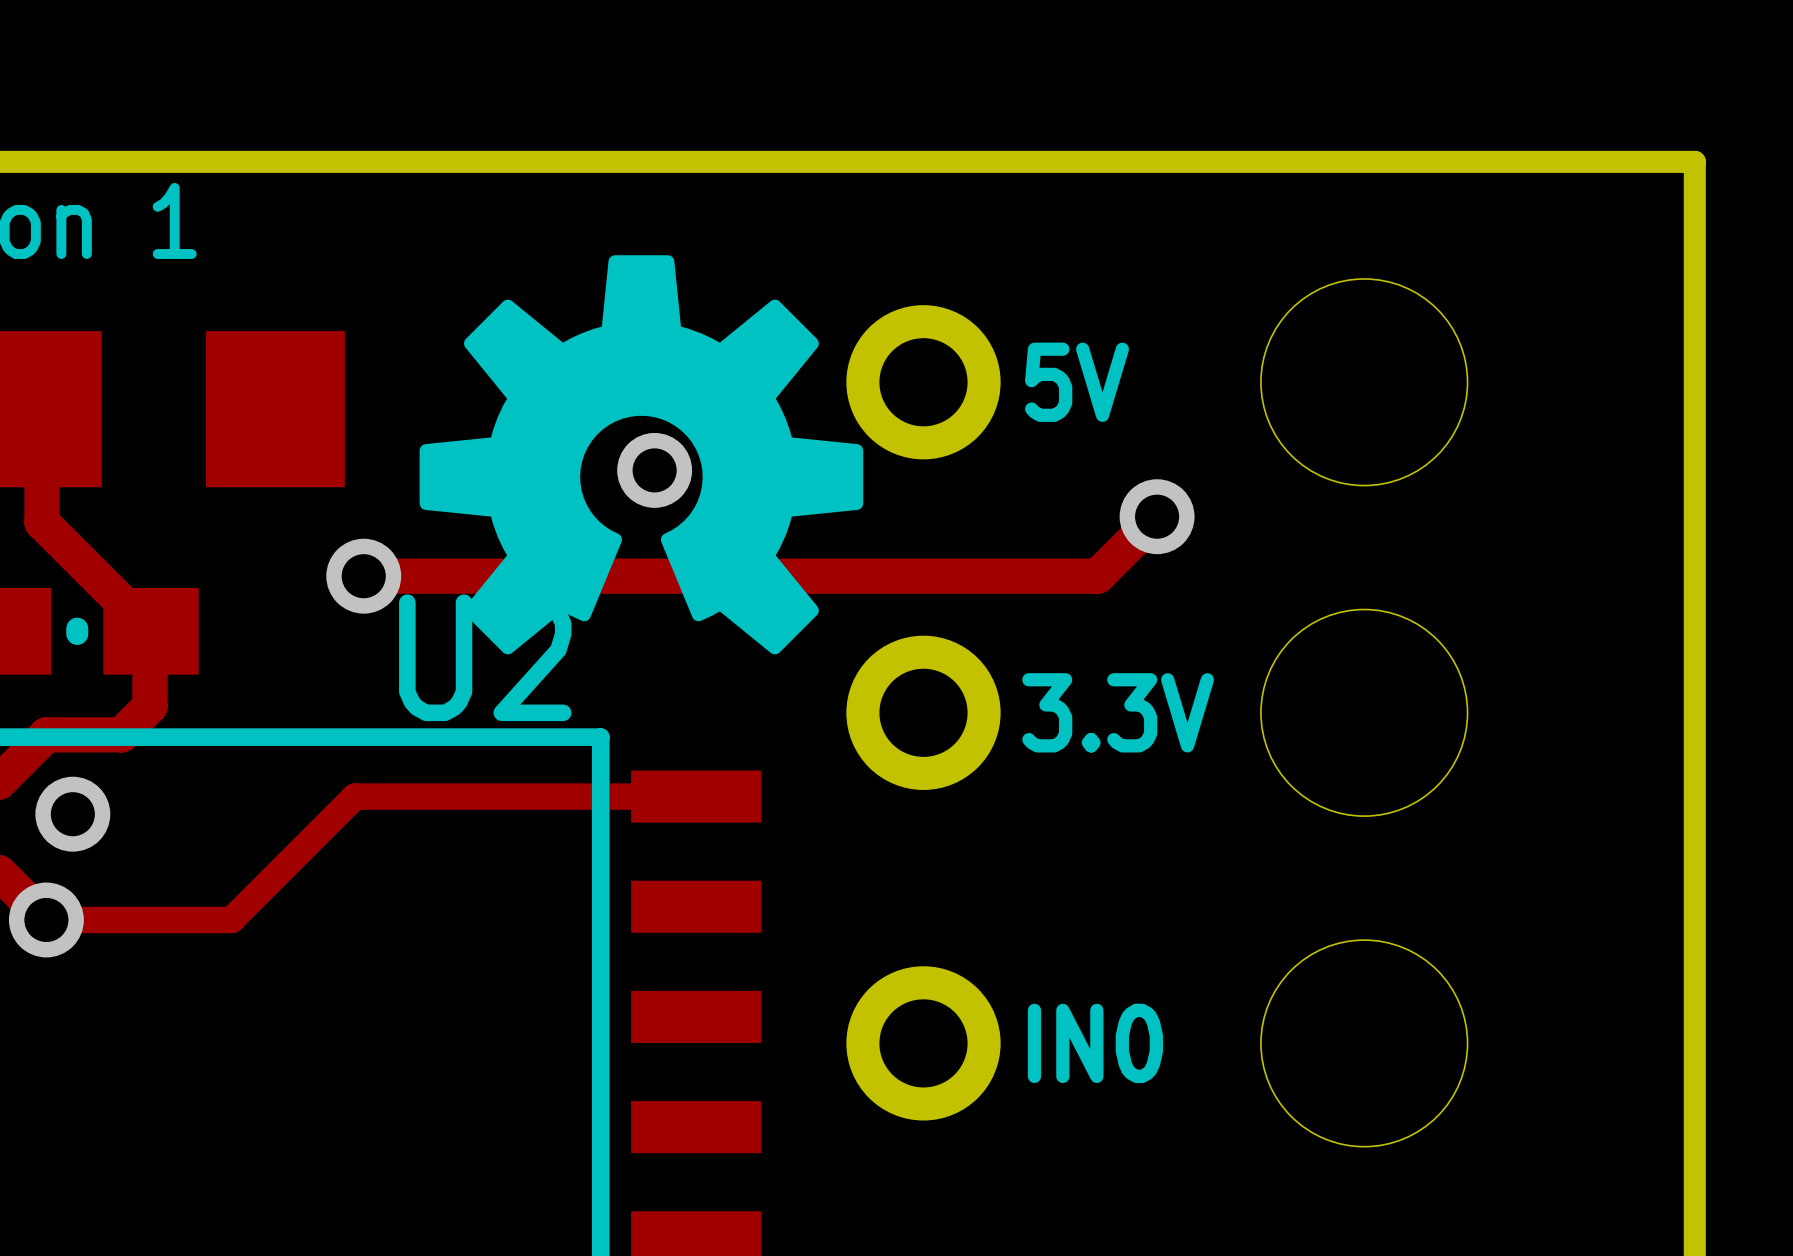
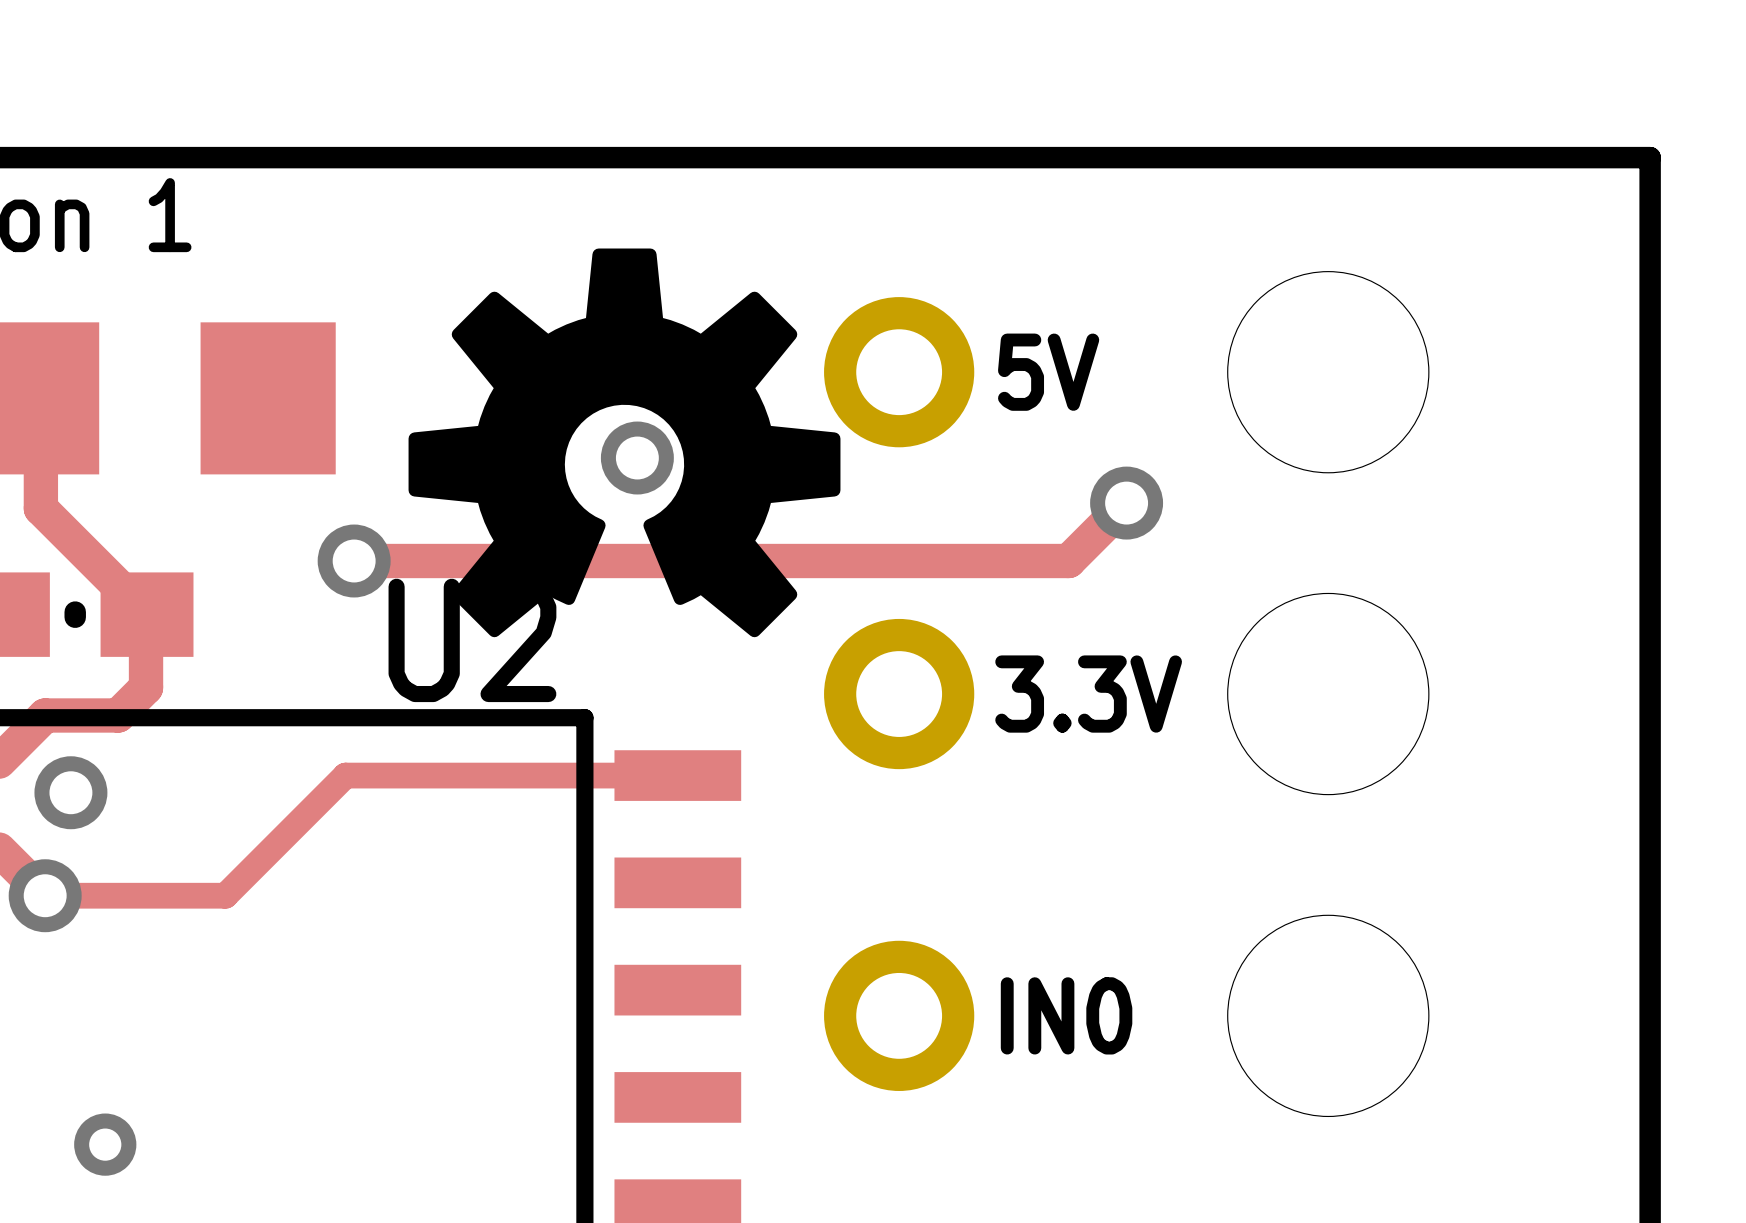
via: none -> (105, 1144)

